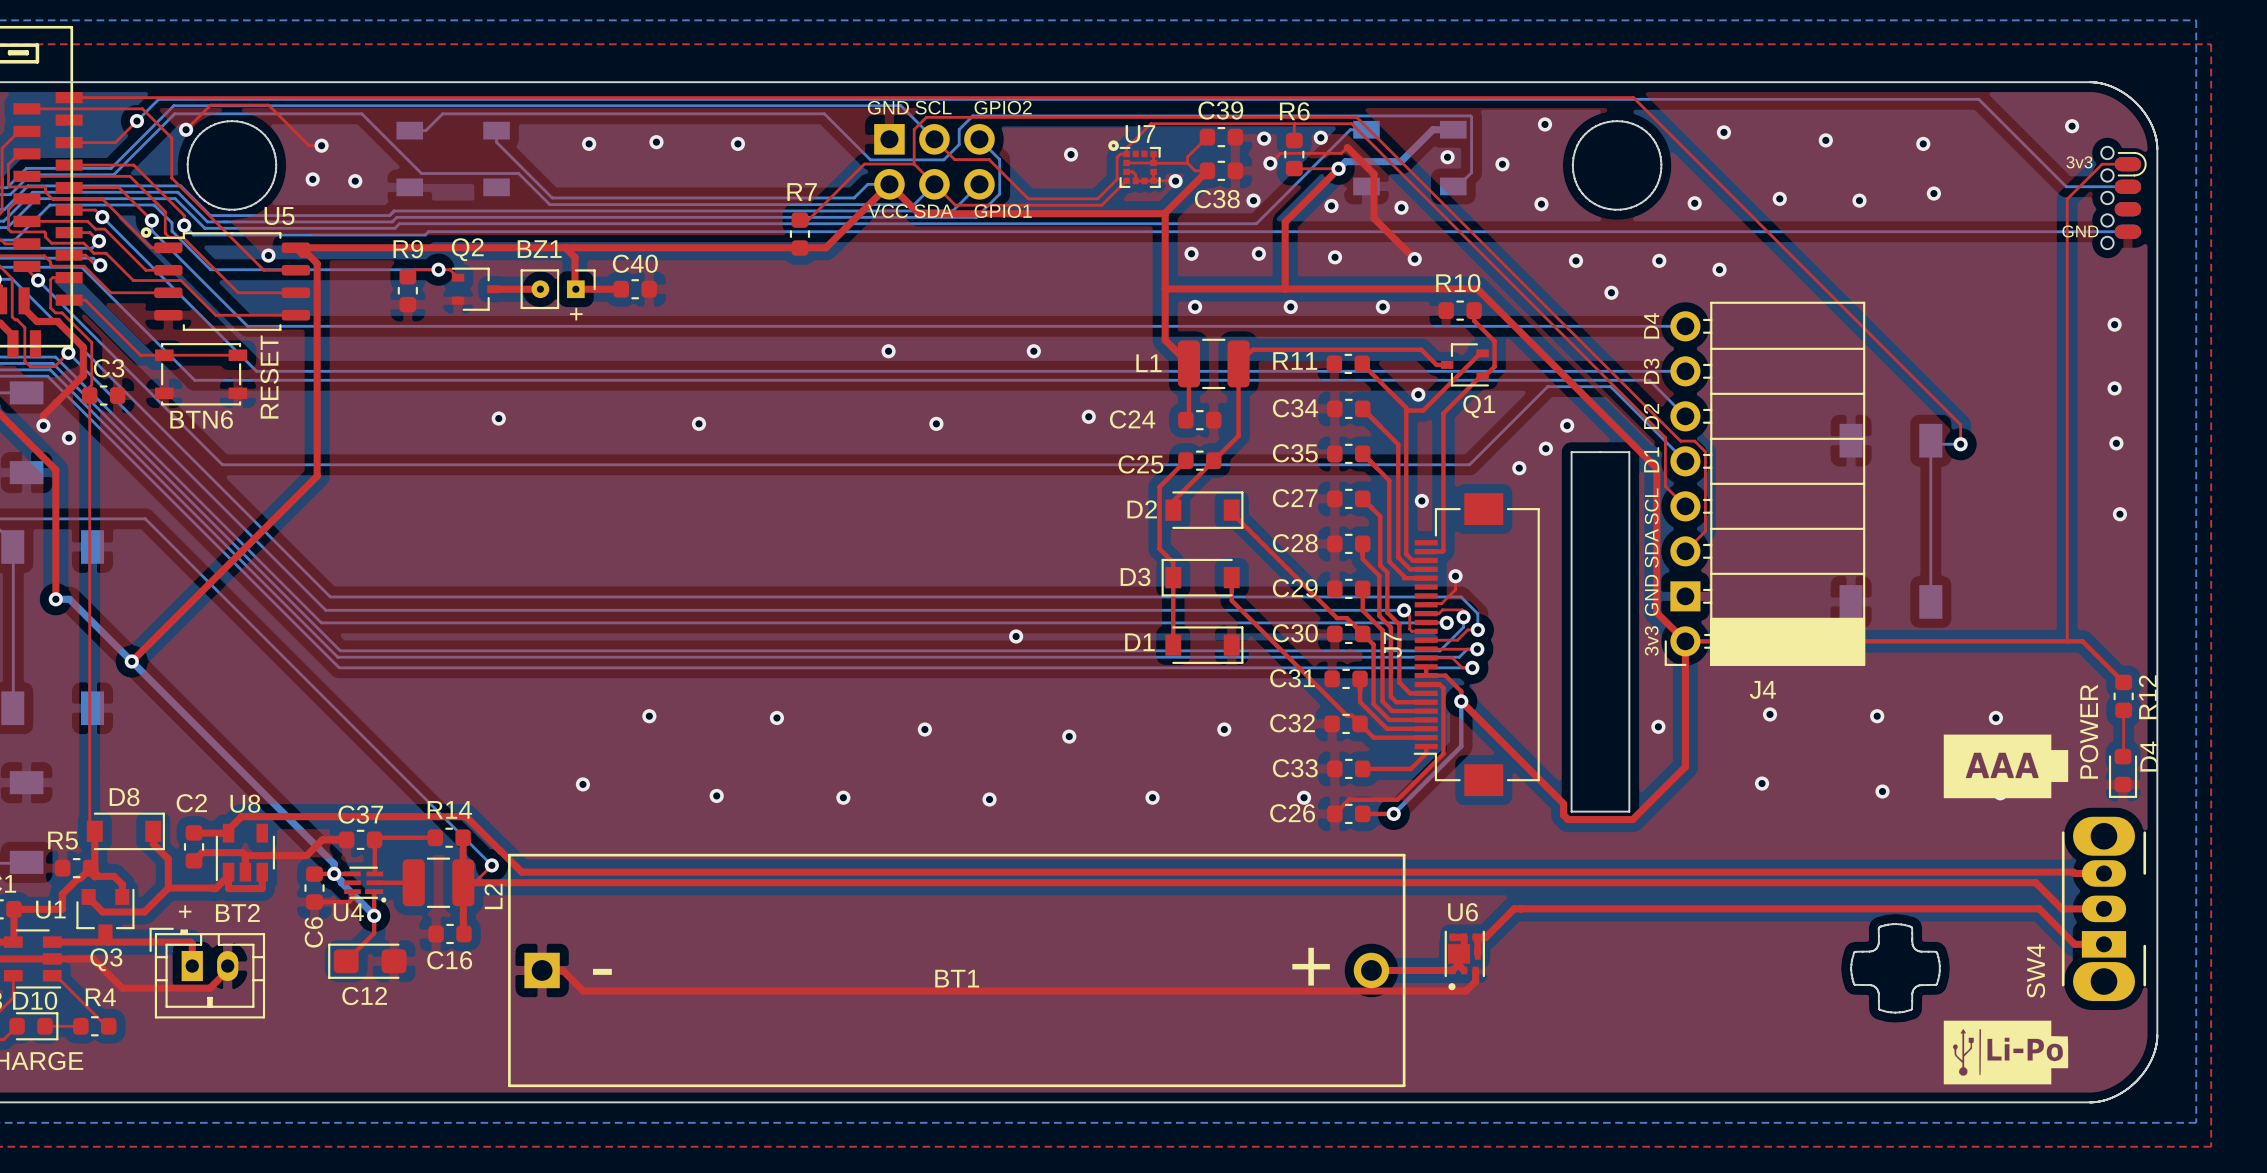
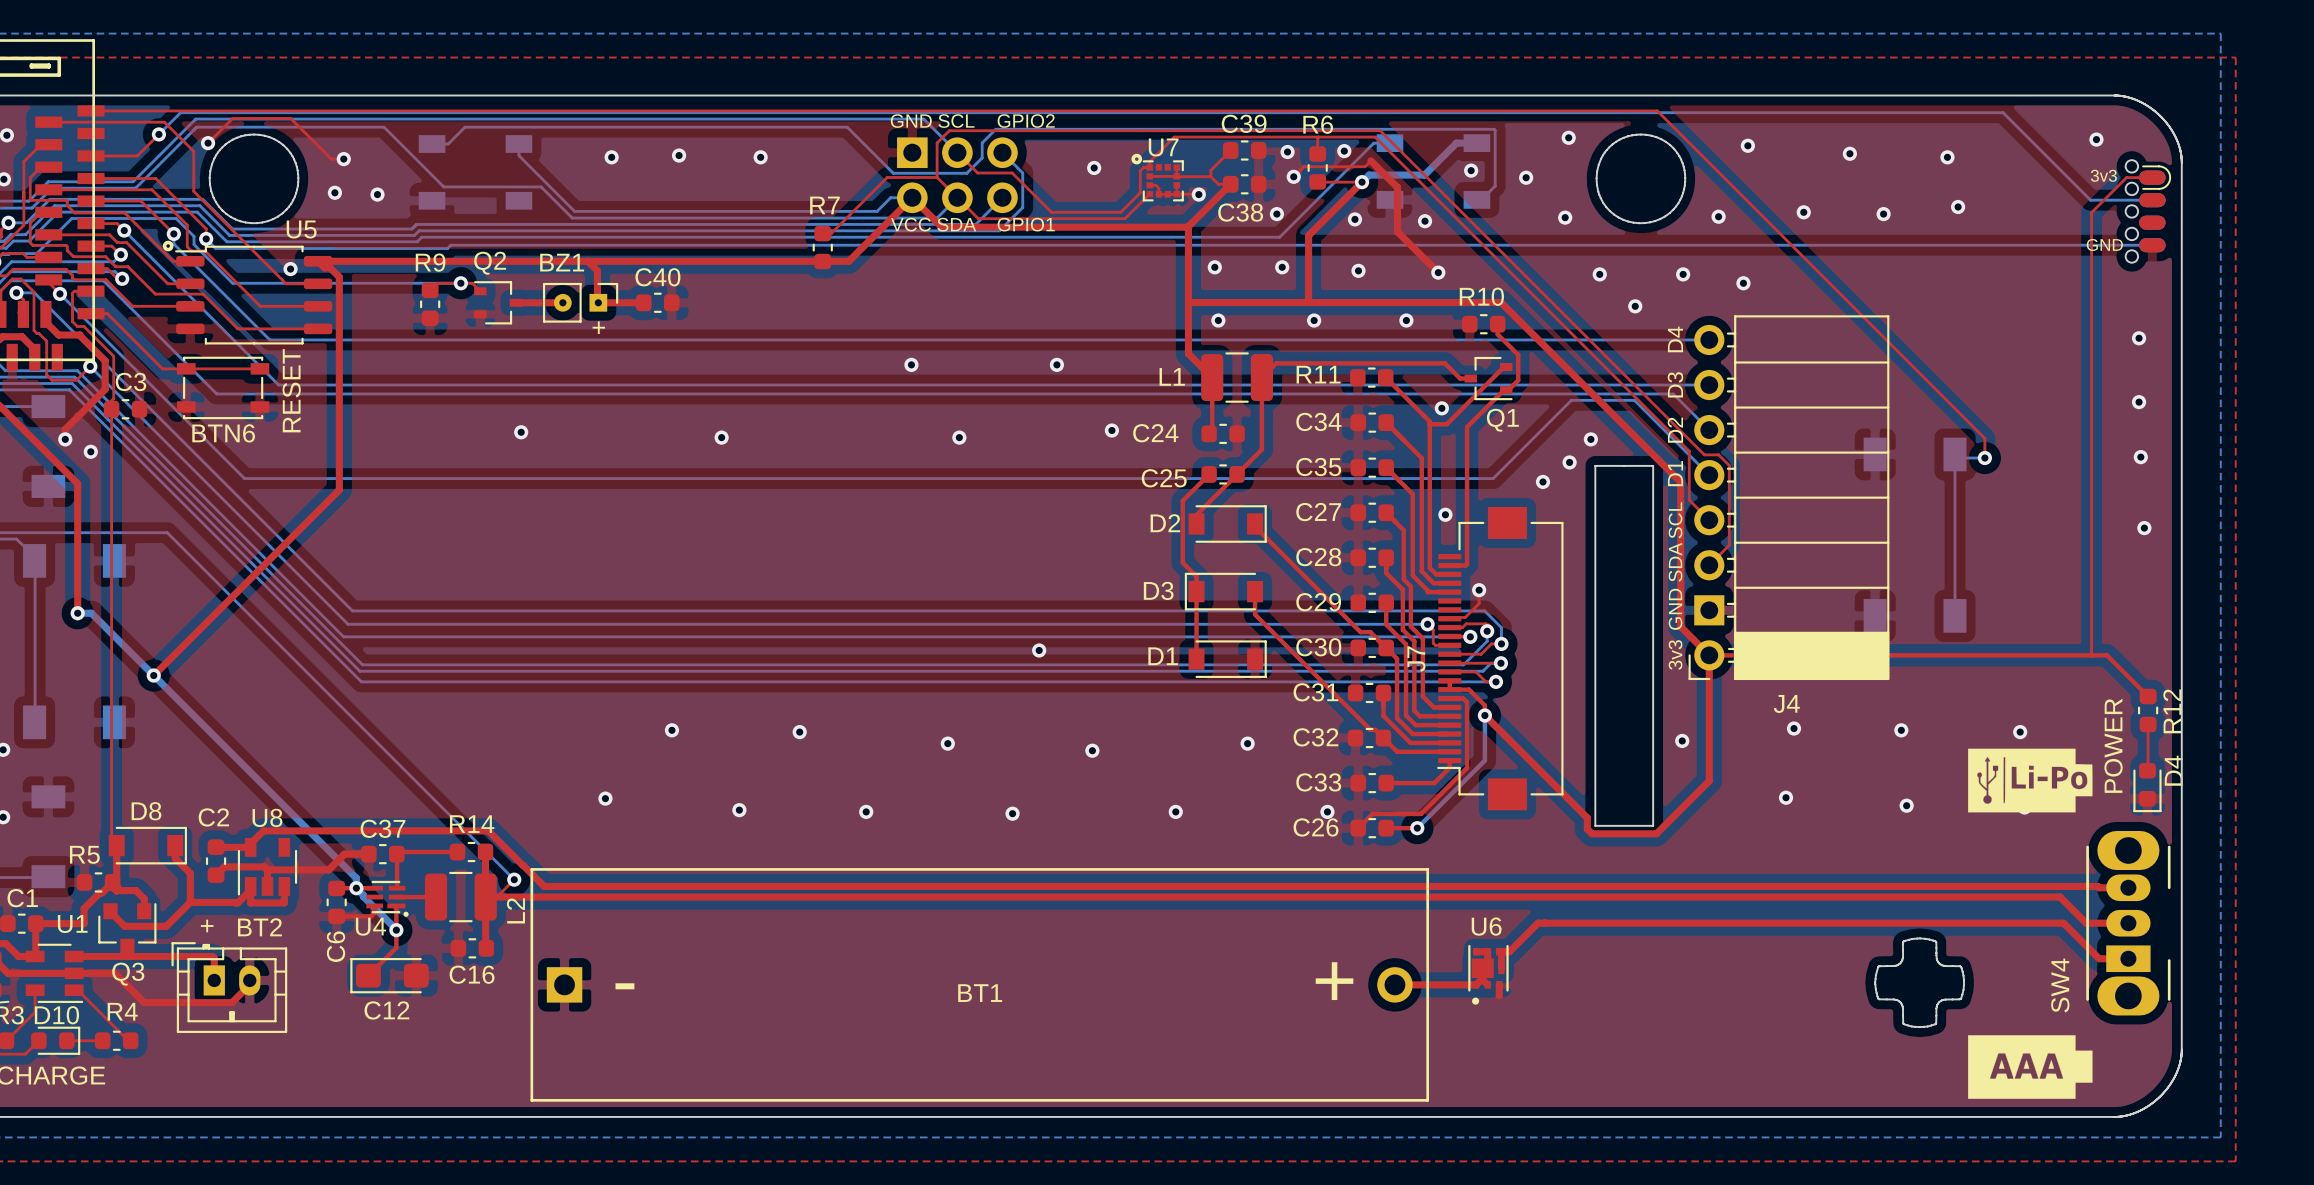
drawing position: (2005, 766) -> (2030, 1067)
top track: (542, 970) (562, 970) (583, 991) (1465, 991) (1475, 981) -> none
drawing position: (2005, 1052) -> (2030, 780)

